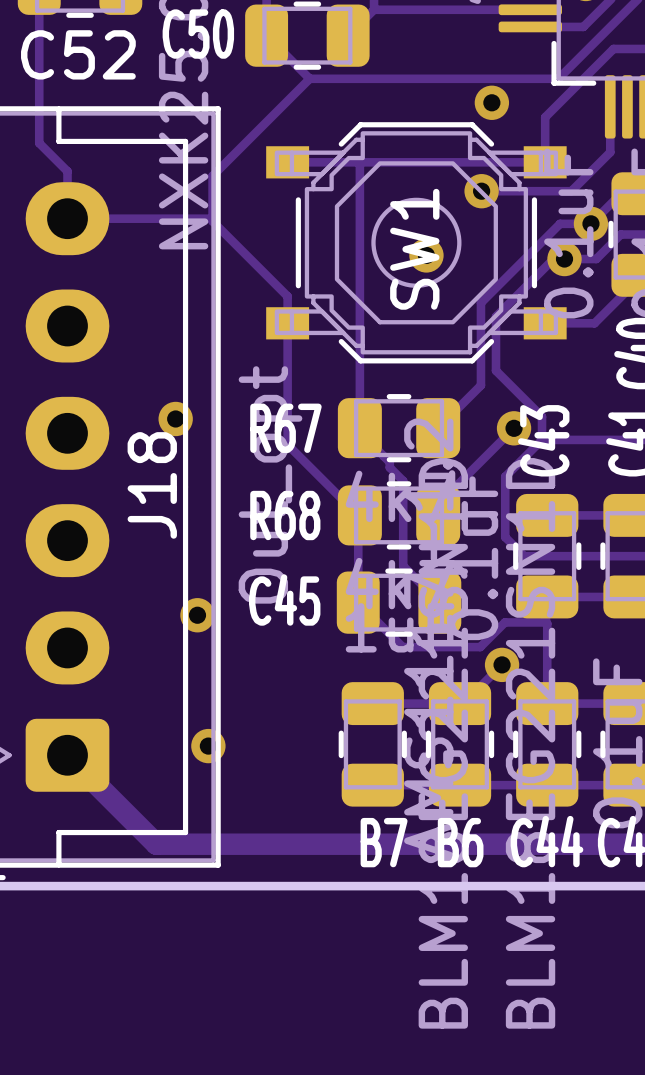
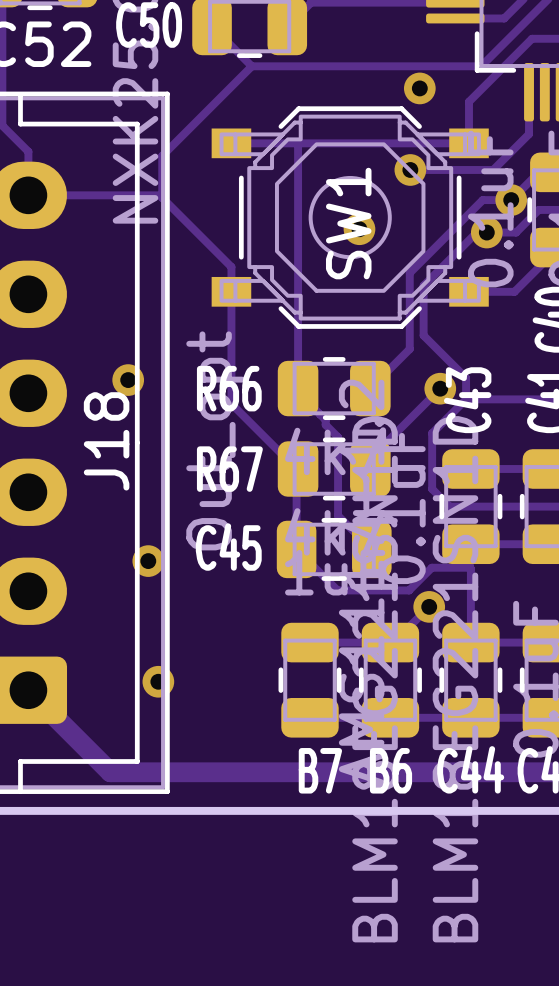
R67 name: R67 (285, 428) -> R66 (229, 388)
R68 name: R68 (285, 515) -> R67 (229, 469)

